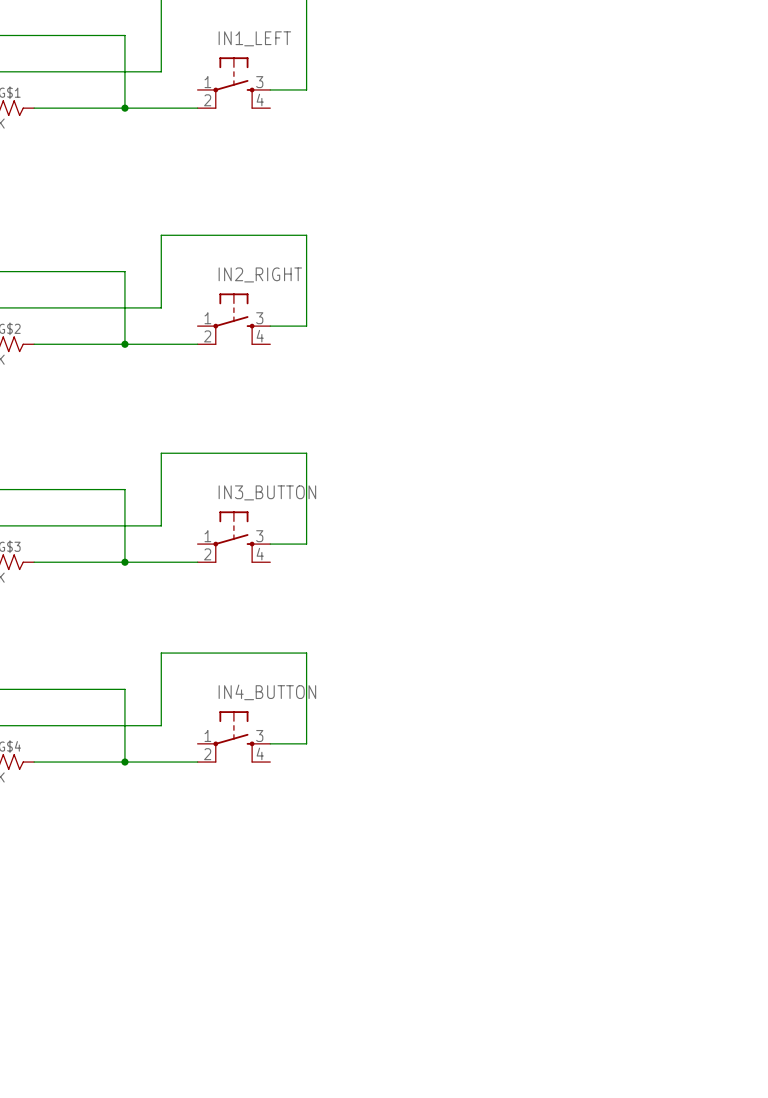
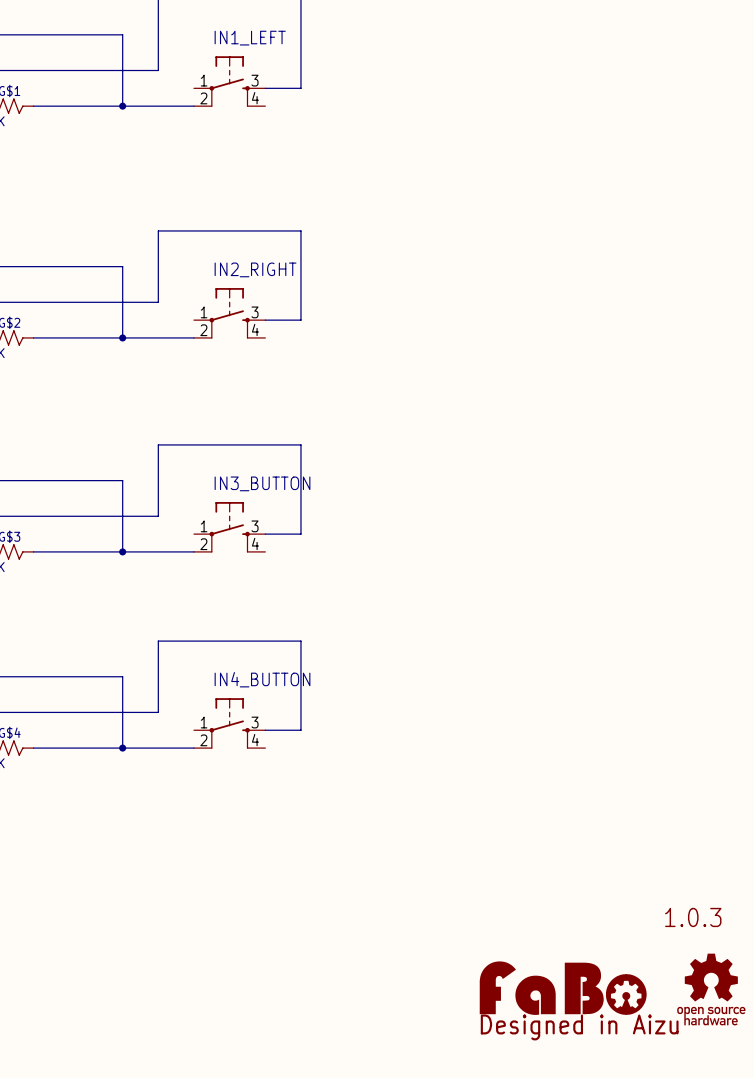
text: none -> 1.0.3 (693, 917)
part: none -> (563, 988)
part: none -> (711, 989)

